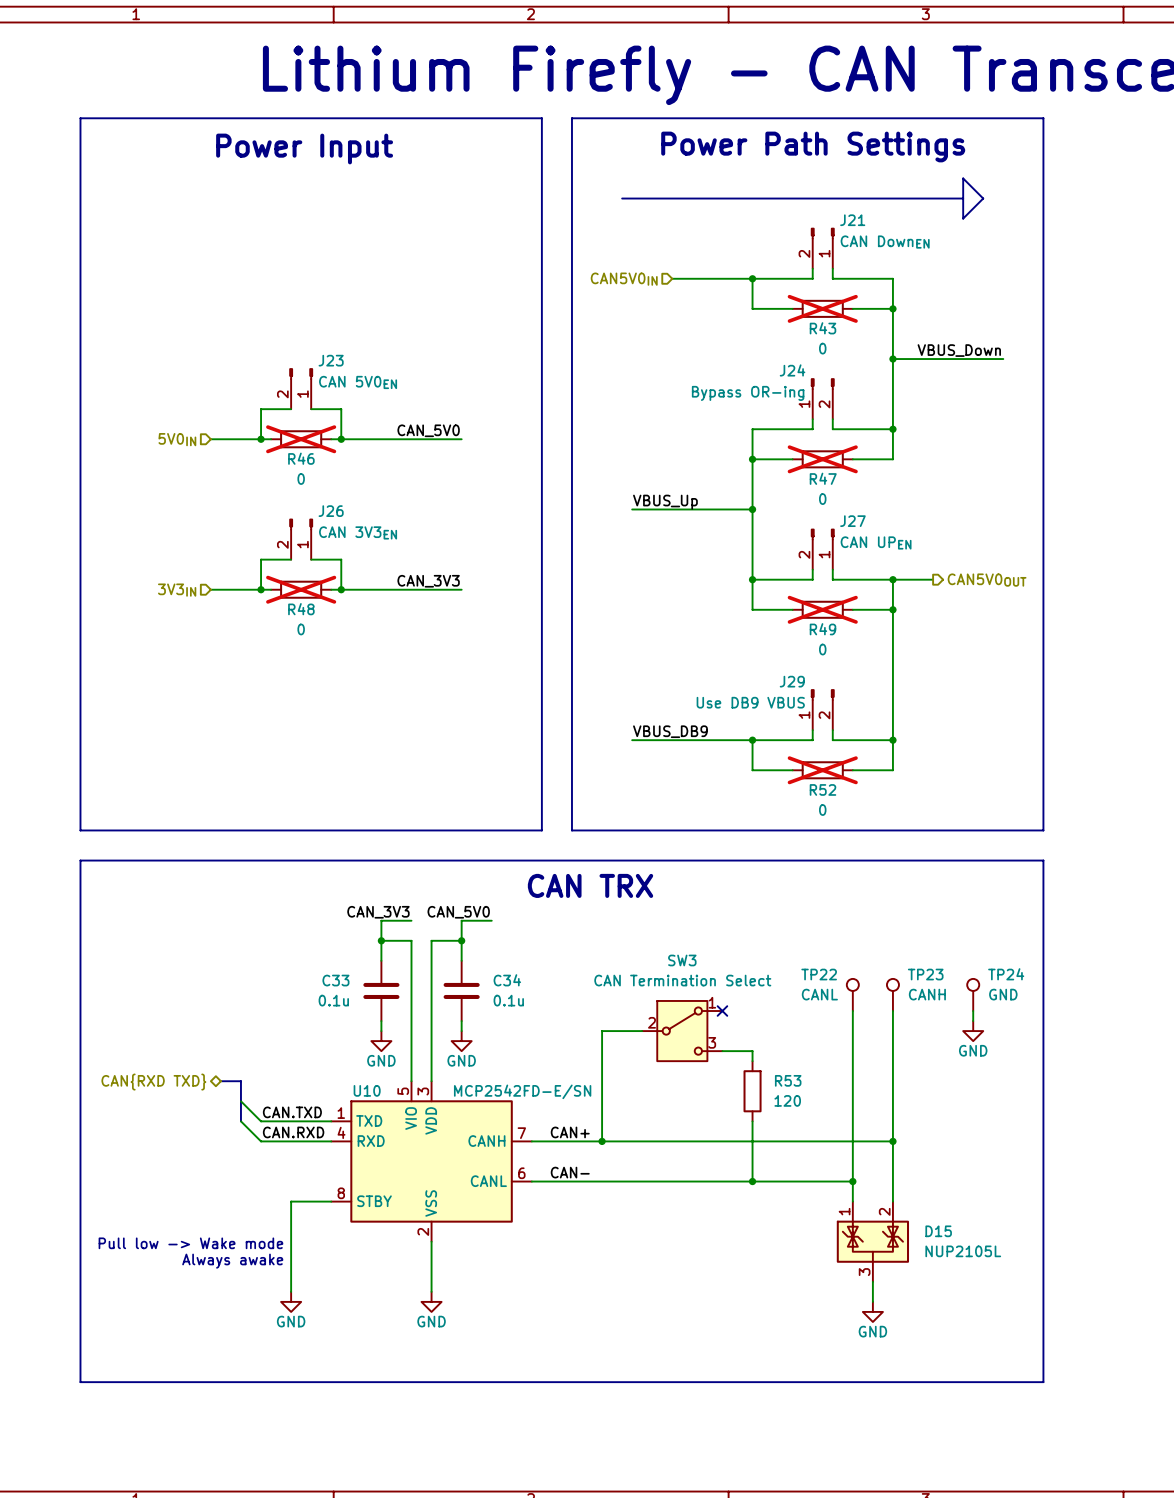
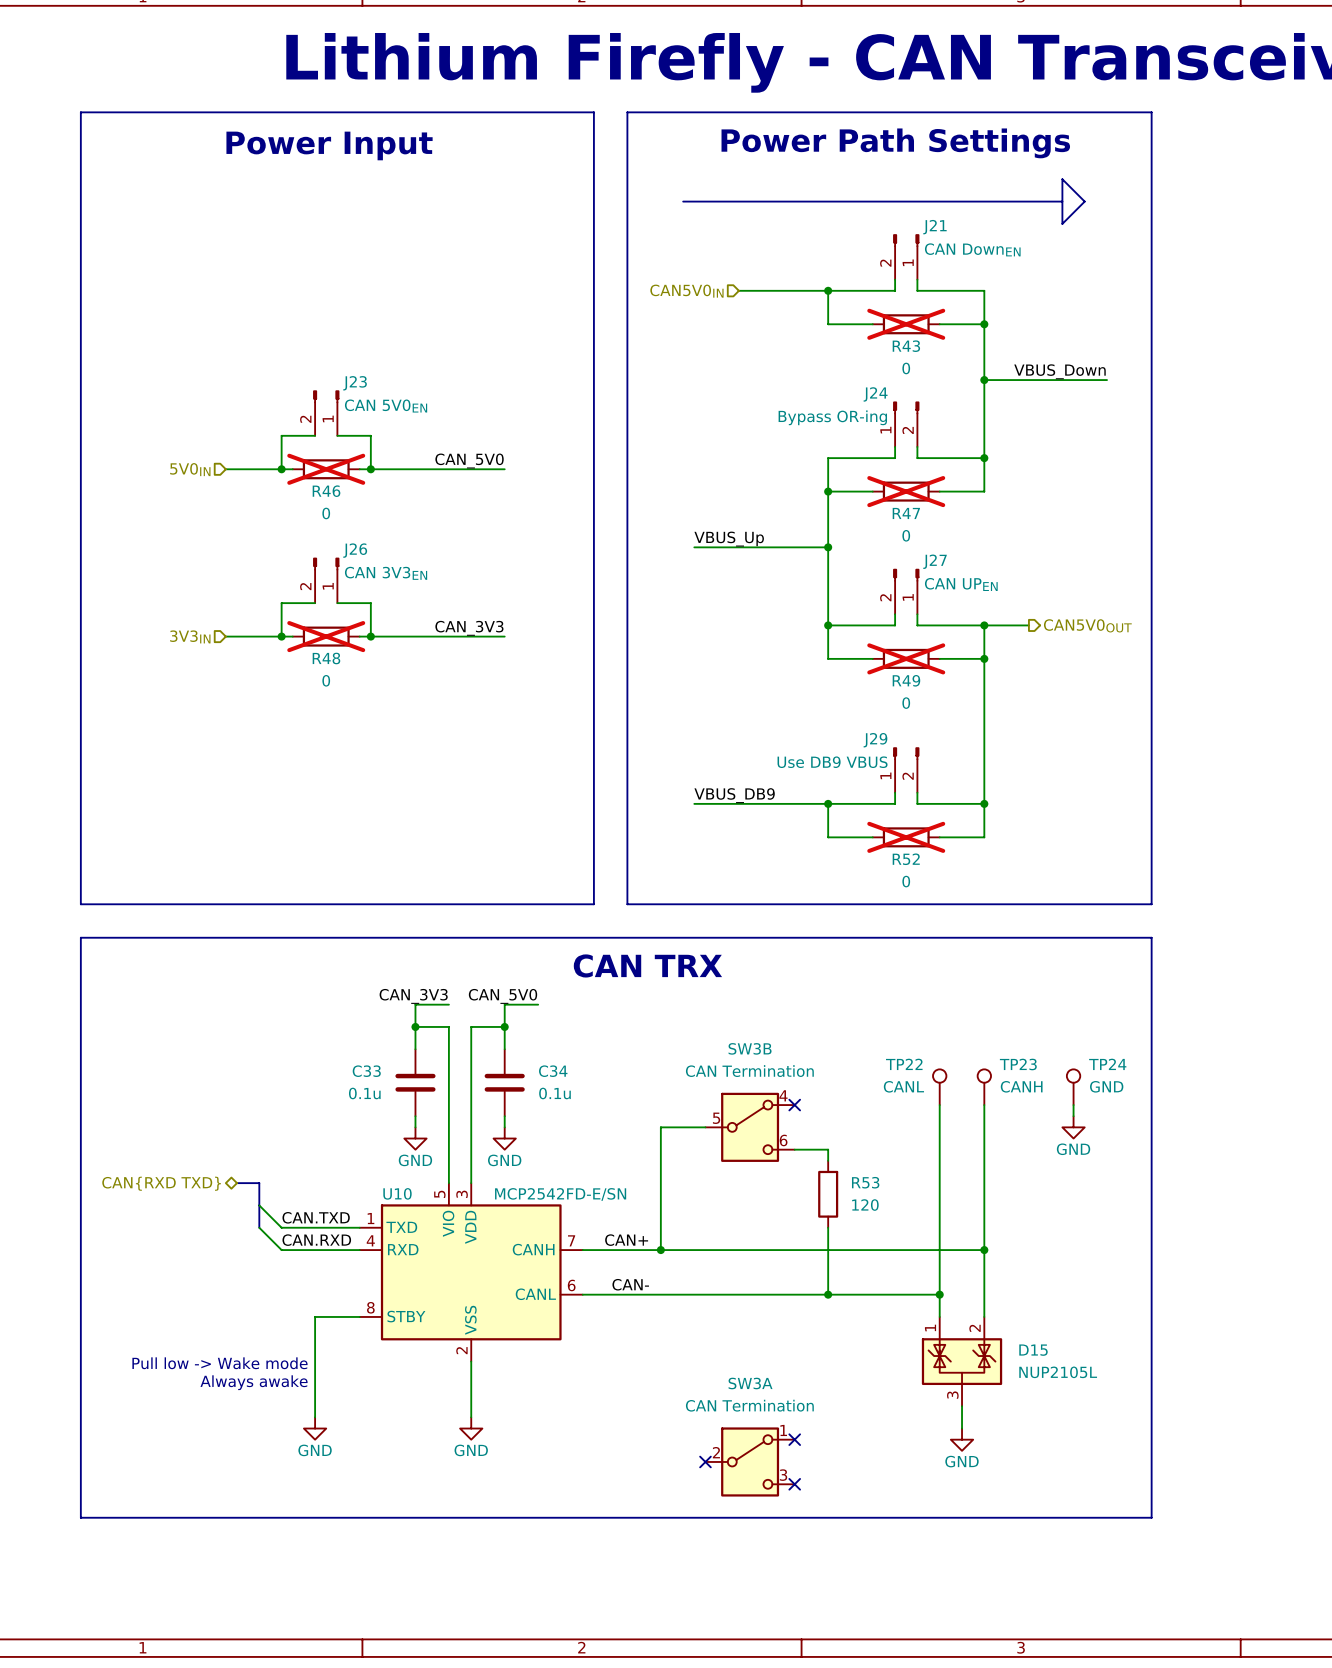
SW3: CAN Termination Select (682, 1031) -> none
SW3B: none -> CAN Termination (750, 1127)
no-connect mark: none -> (794, 1439)
no-connect mark: none -> (705, 1461)
SW3A: none -> CAN Termination (750, 1461)
no-connect mark: none -> (794, 1484)

